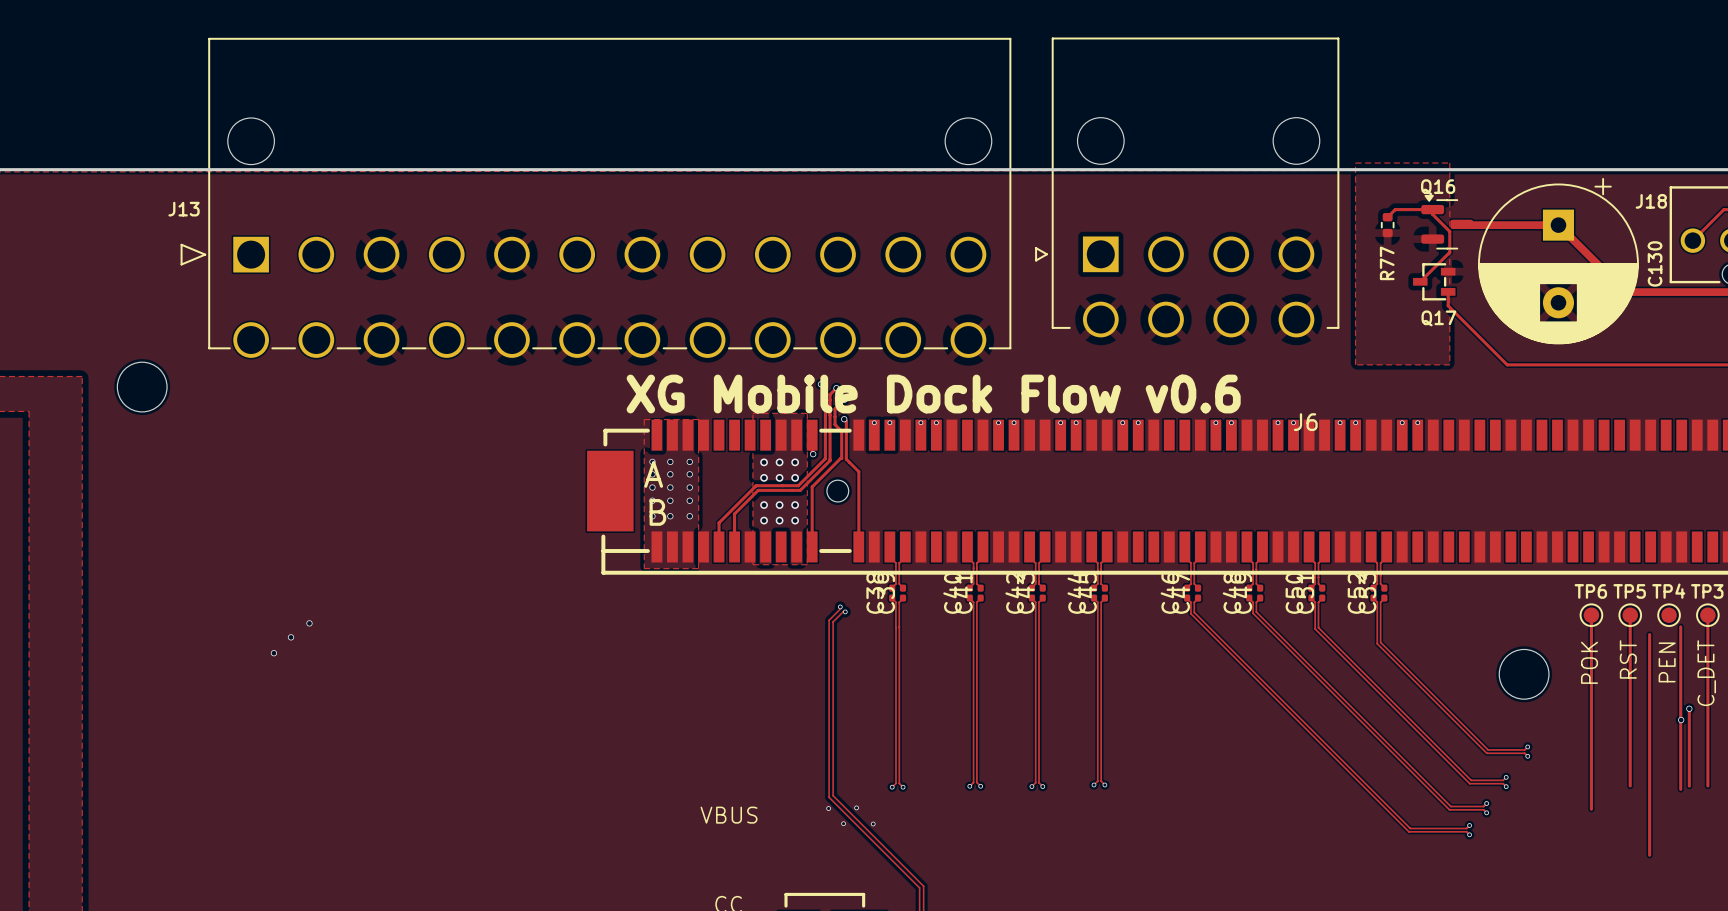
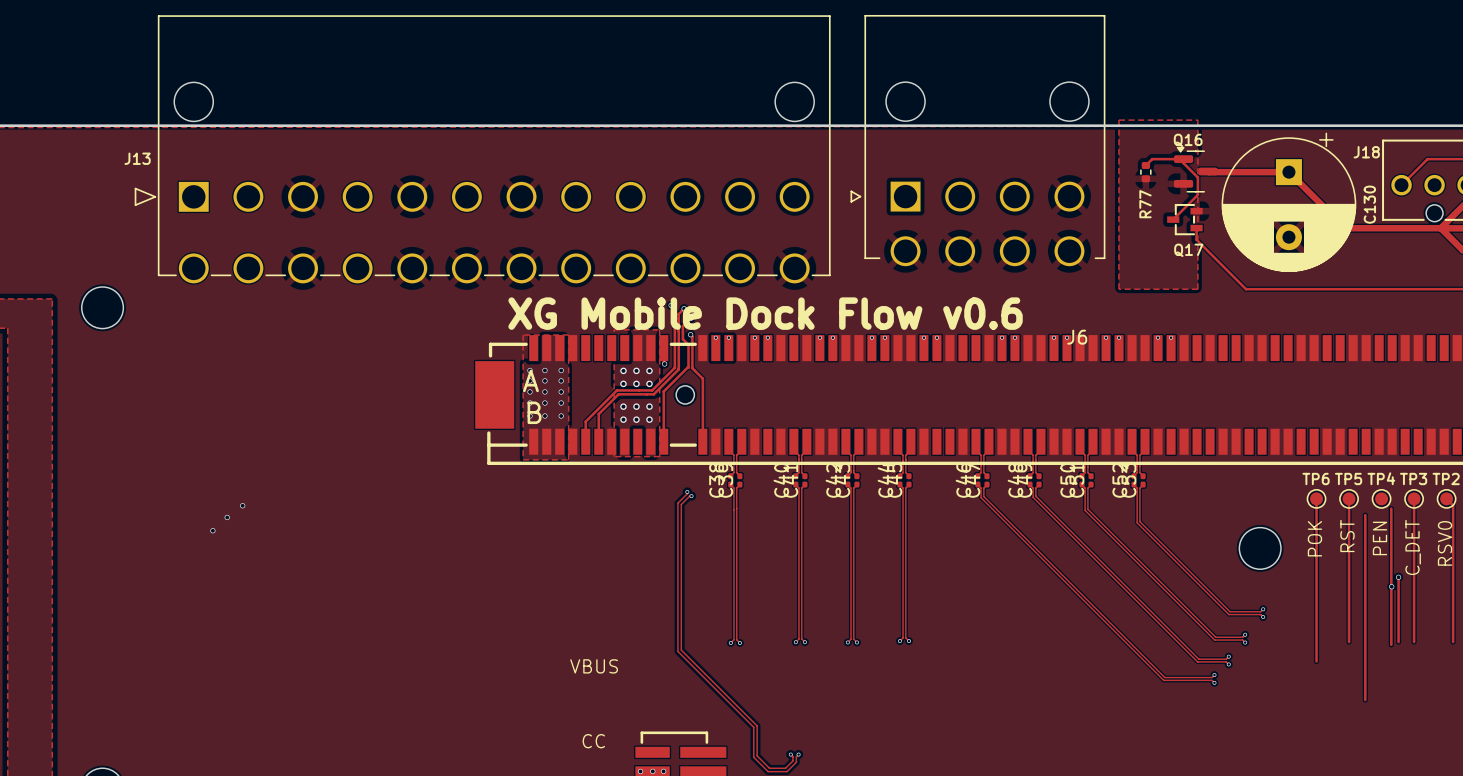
via: (856, 807) -> none
via: (828, 808) -> none
via: (843, 823) -> none
via: (873, 824) -> none

